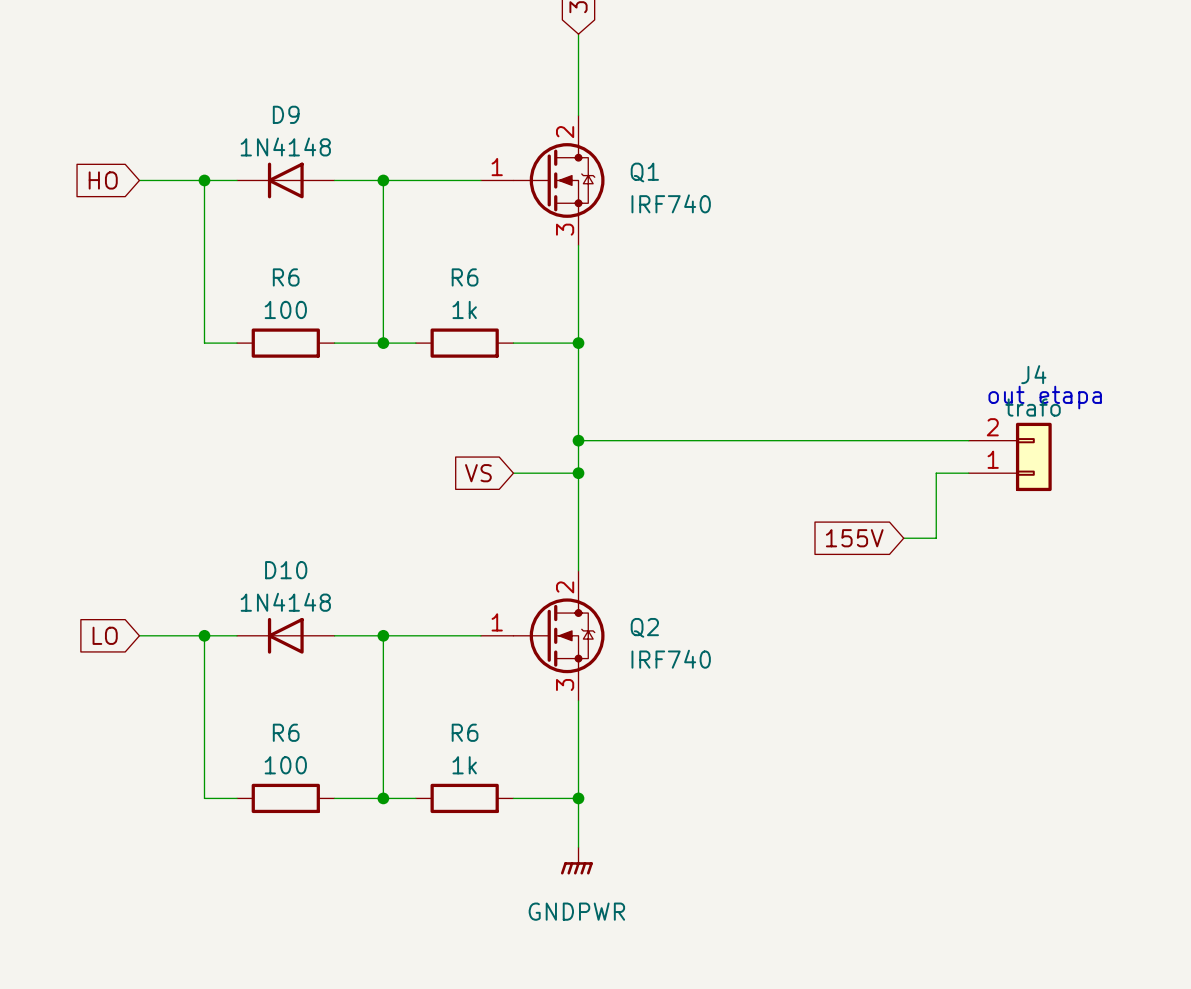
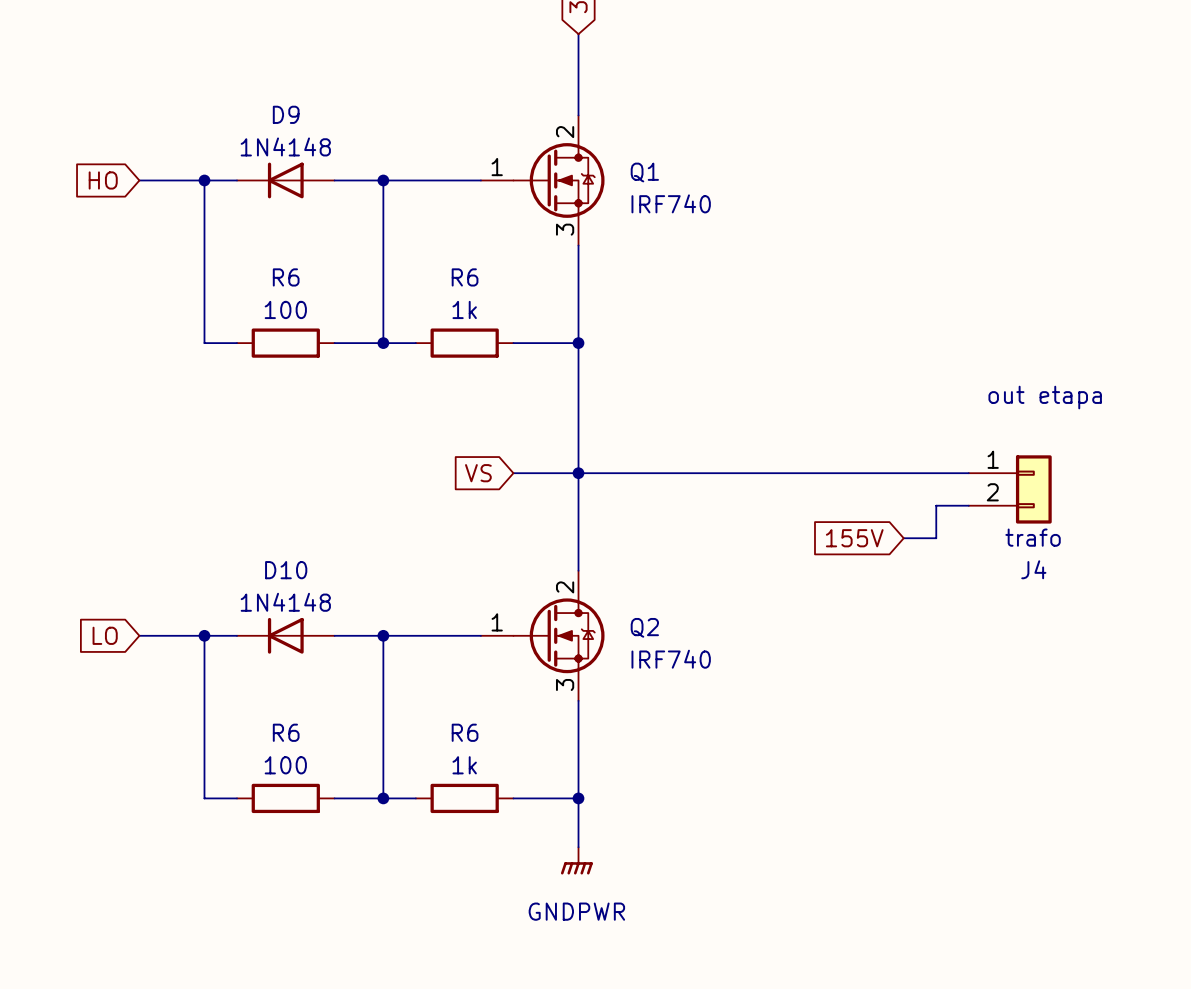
wire: (578, 440) (968, 440) -> none
junction: (578, 440) -> none
J4 flip: as is (1033, 456) -> up-down (1033, 489)
wire: none -> (578, 473) (936, 473)
wire: (936, 473) (936, 505) -> (968, 505) (936, 505)

